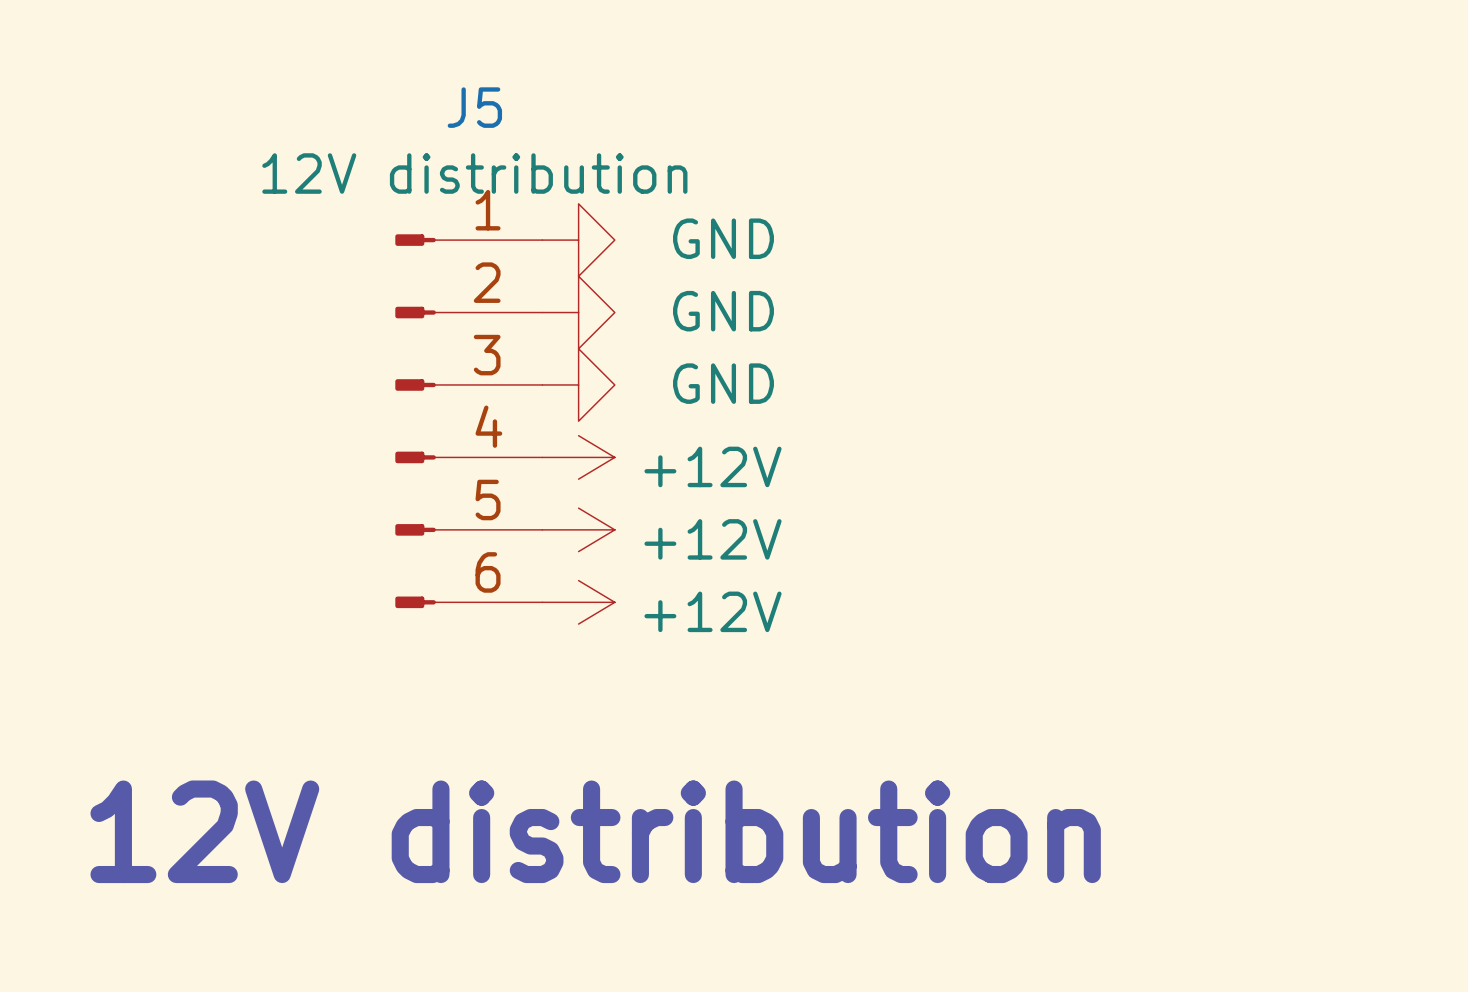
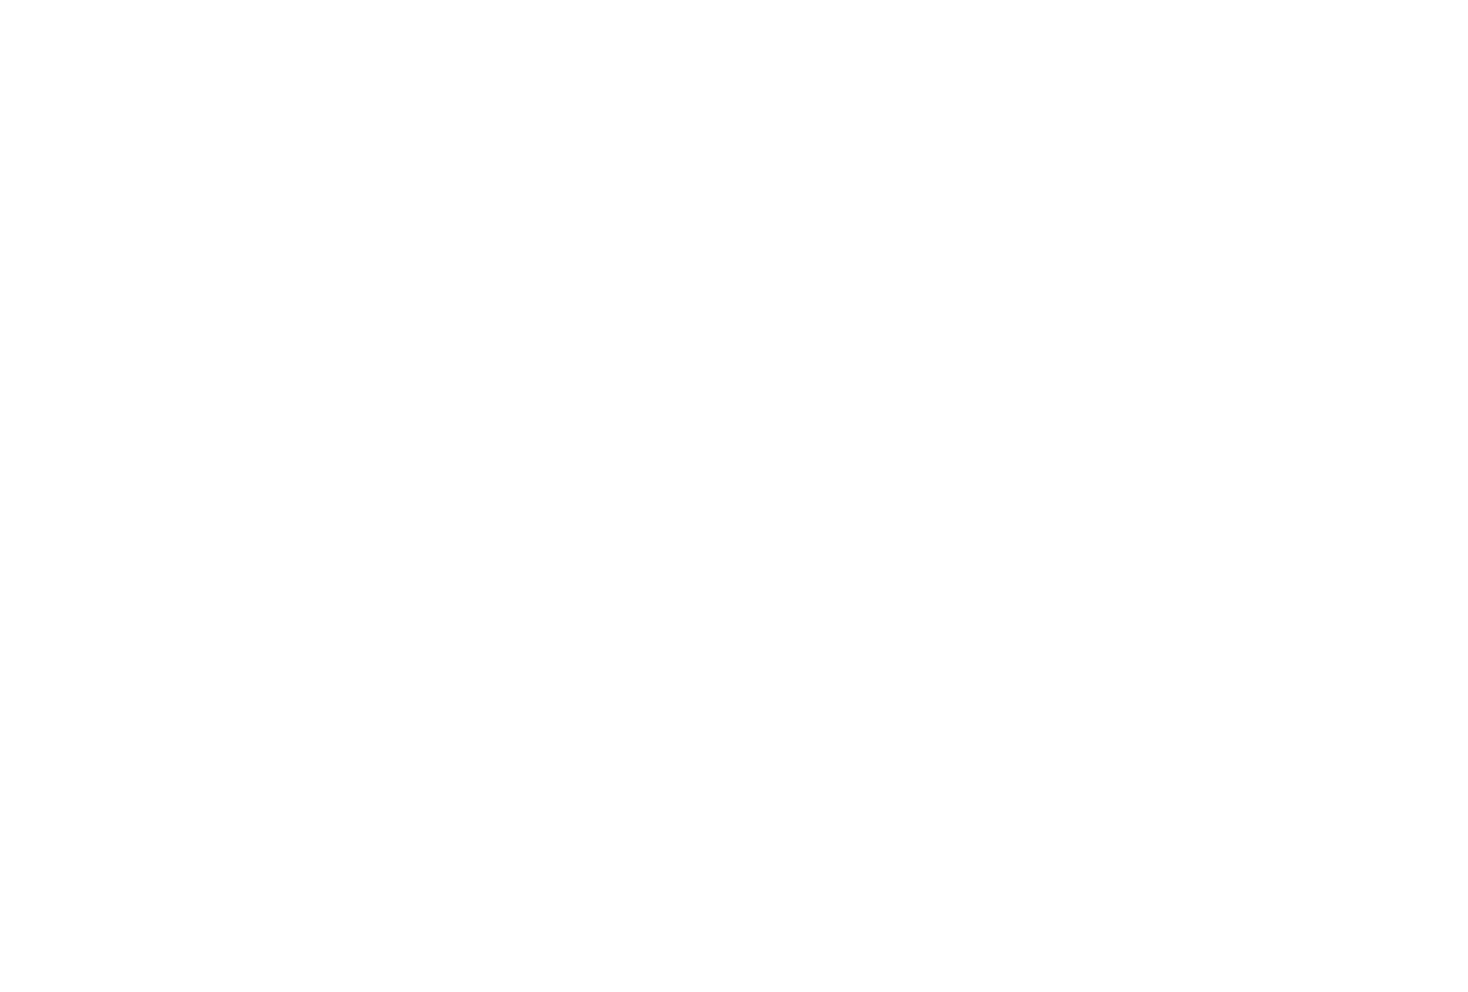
power symbol: GND (578, 240) -> none
power symbol: GND (578, 312) -> none
power symbol: GND (578, 384) -> none
J5: 12V distribution (468, 421) -> none
power symbol: +12V (578, 457) -> none
power symbol: +12V (578, 529) -> none
power symbol: +12V (578, 602) -> none
text: 12V distribution (595, 831) -> none

